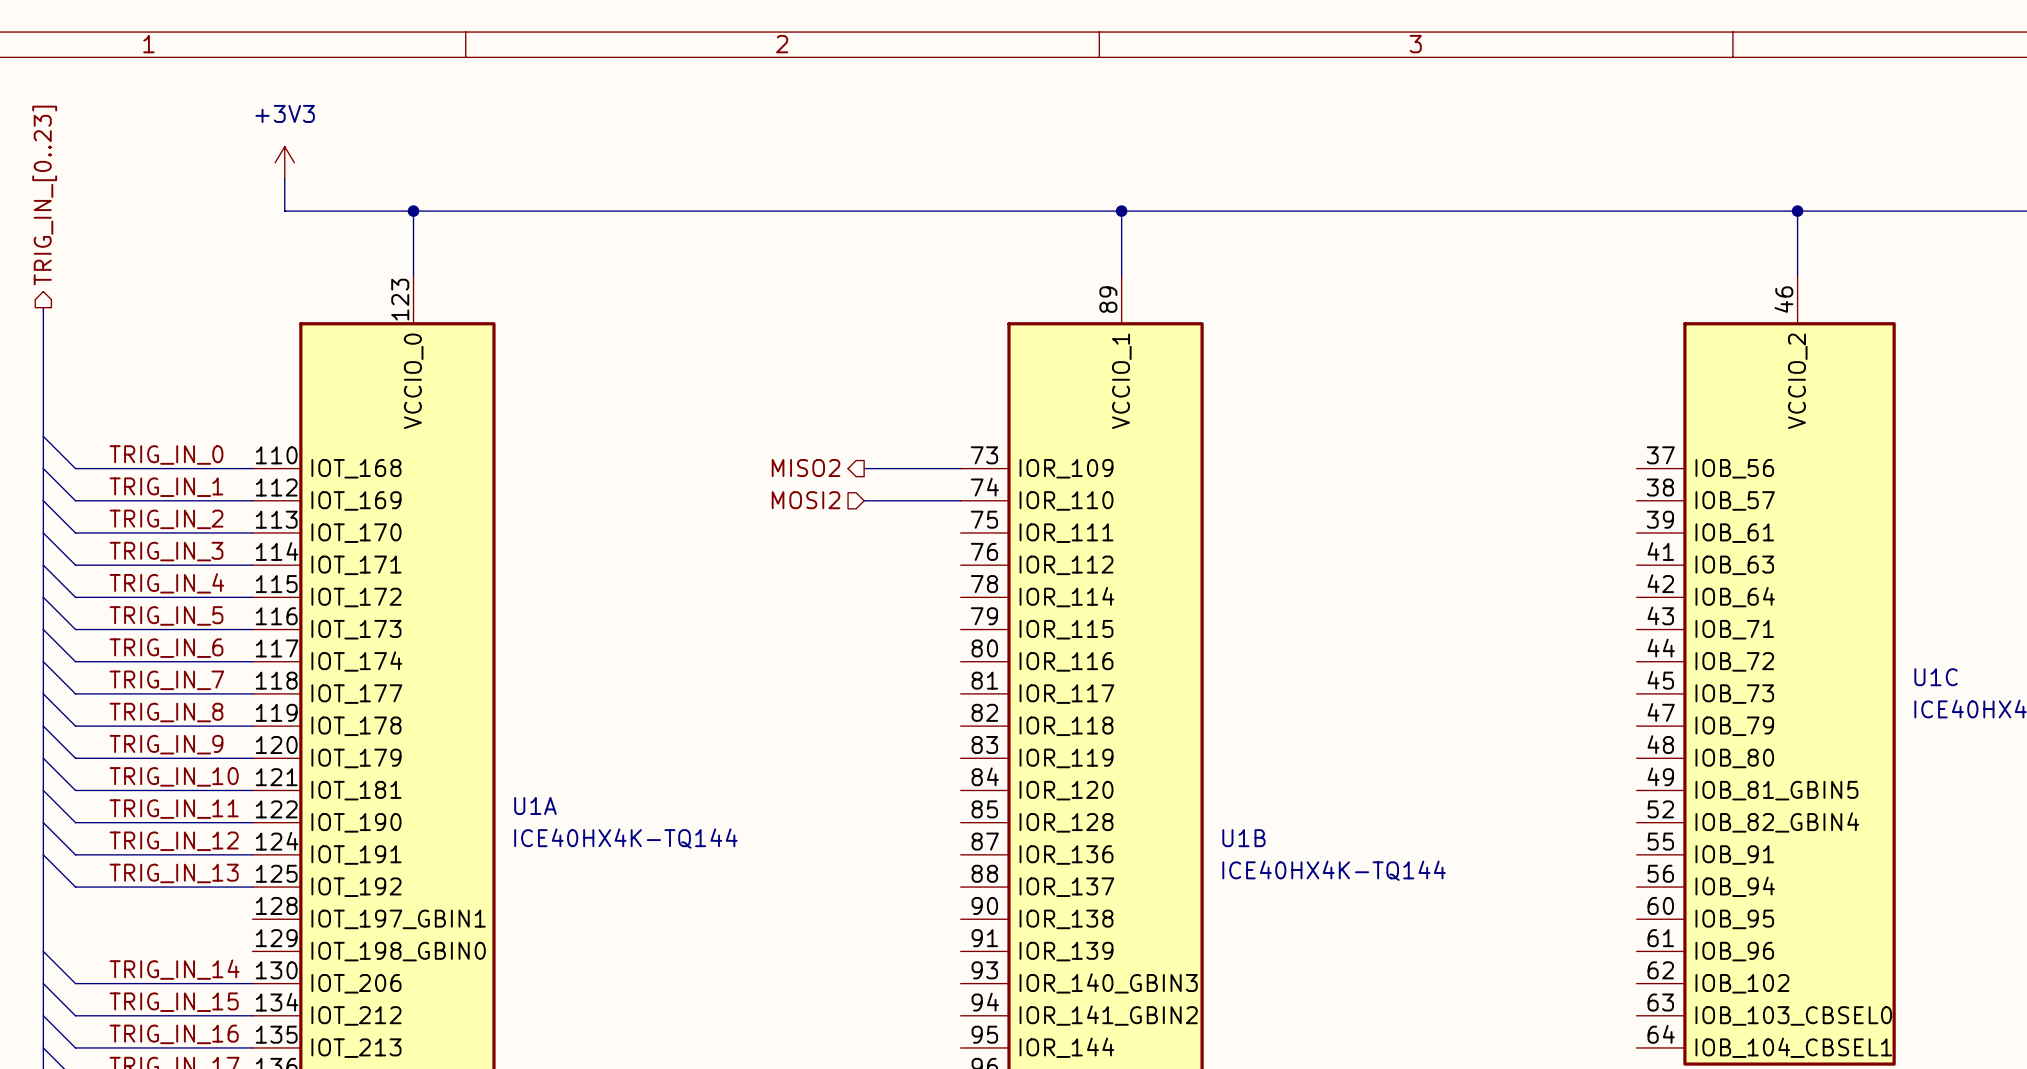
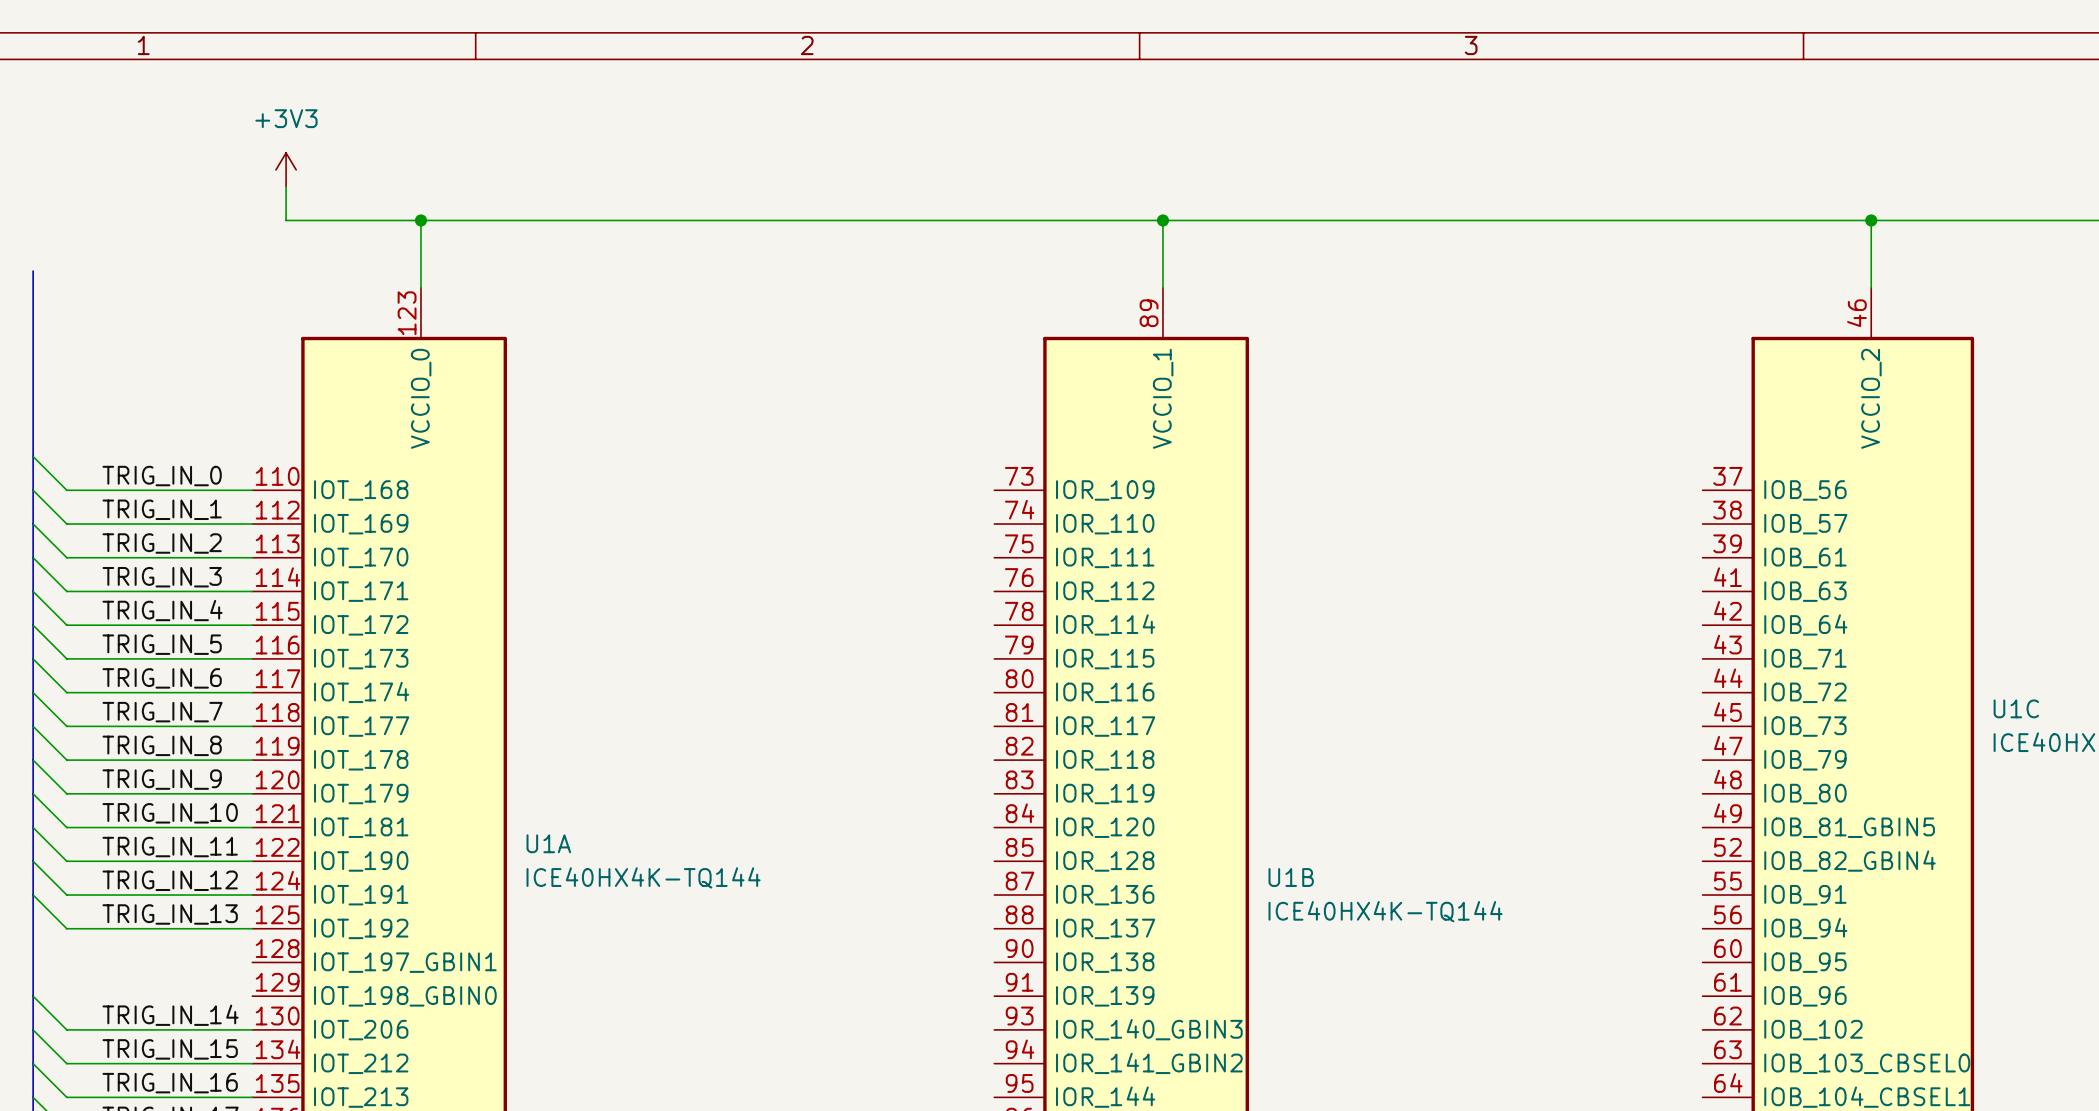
hierarchical label: TRIG_IN_[0..23] (44, 195) -> none
bus: none -> (33, 271) (33, 321)
hierarchical label: MISO2 (806, 468) -> none
wire: (864, 468) (960, 468) -> none
hierarchical label: MOSI2 (806, 500) -> none
wire: (864, 500) (960, 500) -> none

